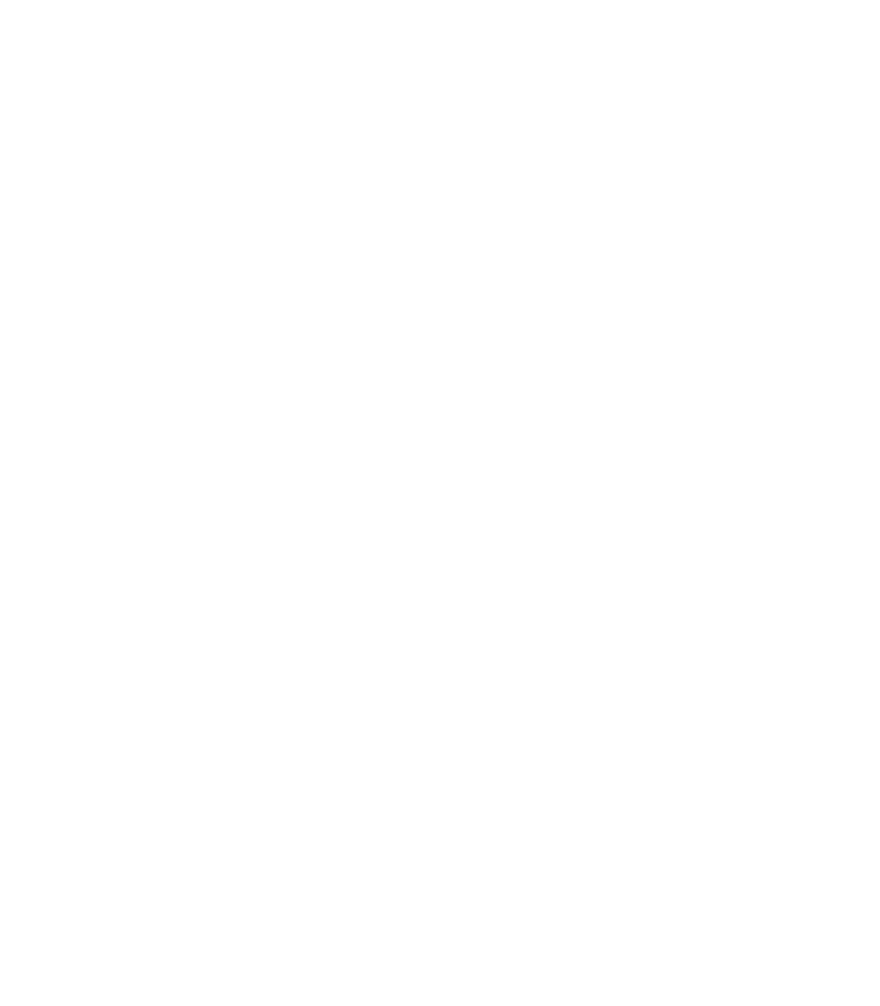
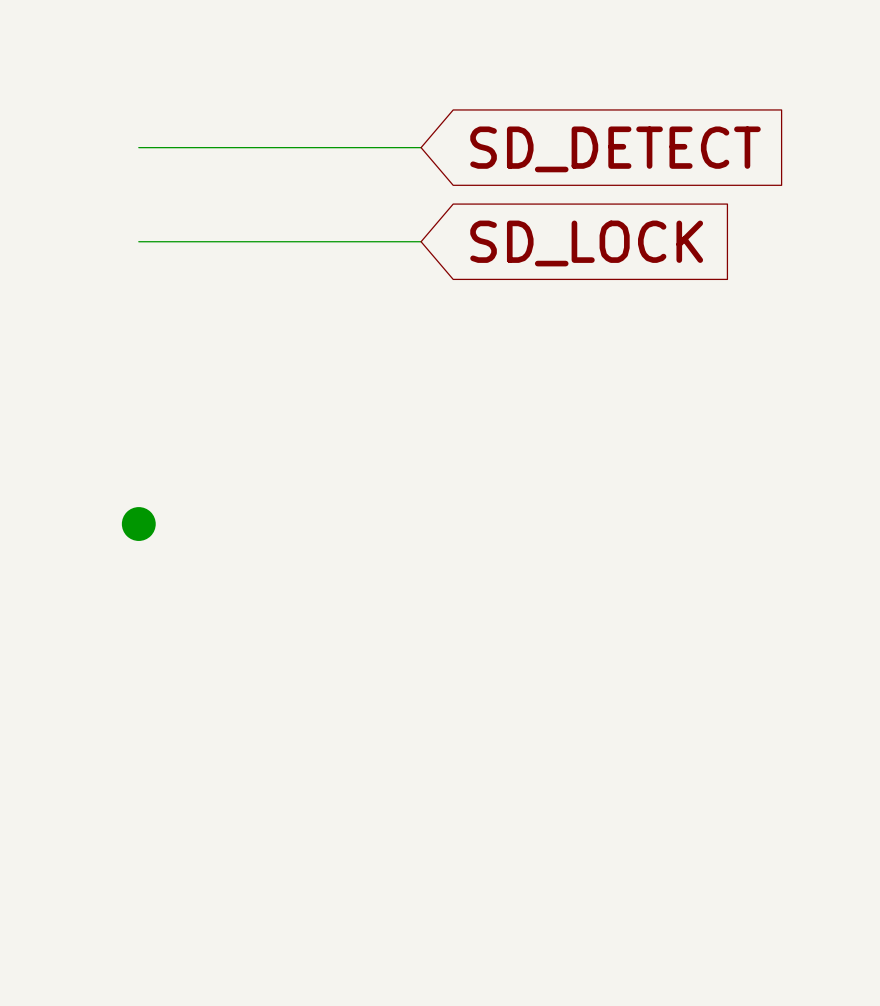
wire: none -> (138, 147) (421, 147)
global label: none -> SD_DETECT (615, 149)
wire: none -> (138, 241) (421, 241)
global label: none -> SD_LOCK (586, 243)
junction: none -> (138, 524)

